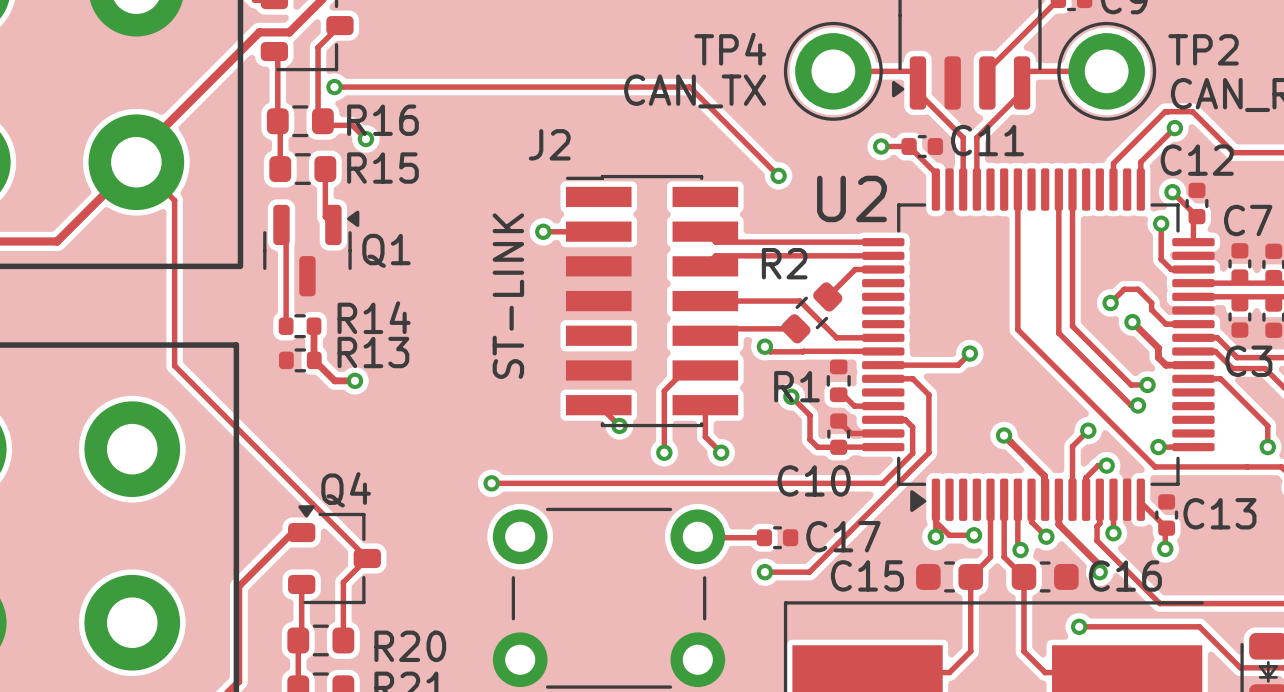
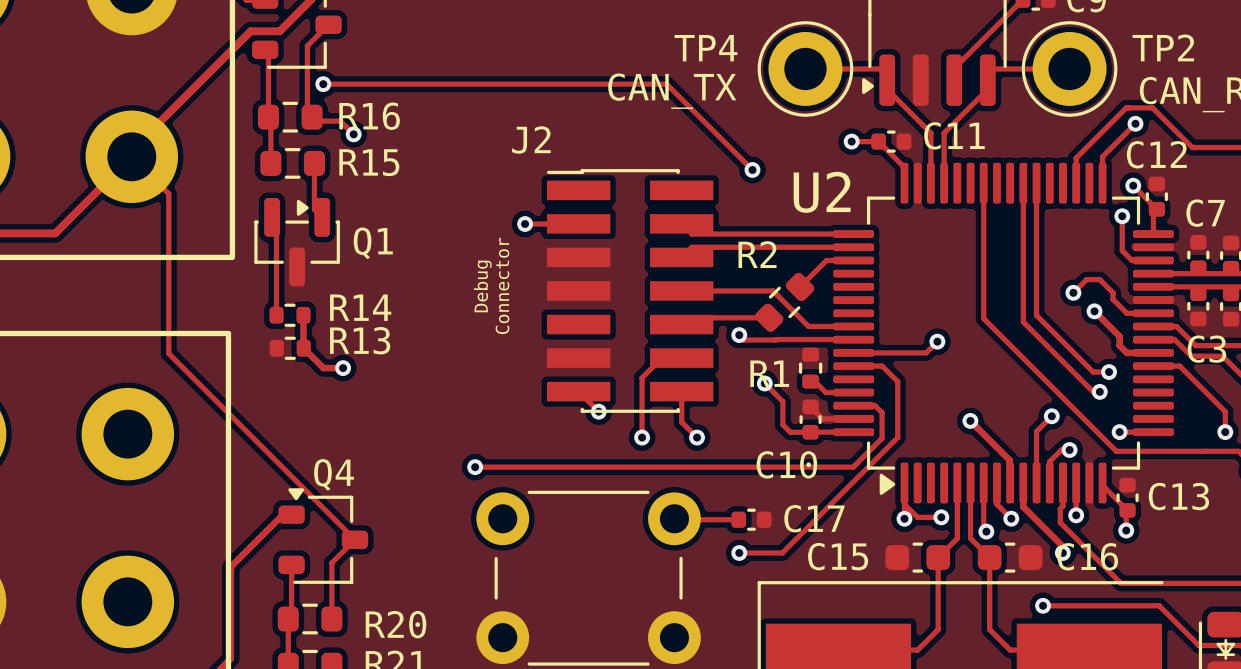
Q1 footprint: [263, 204, 360, 297] -> [254, 197, 340, 287]
text: none -> Connector (502, 285)
text: none -> Debug (482, 286)
text: ST-LINK (508, 296) -> none

